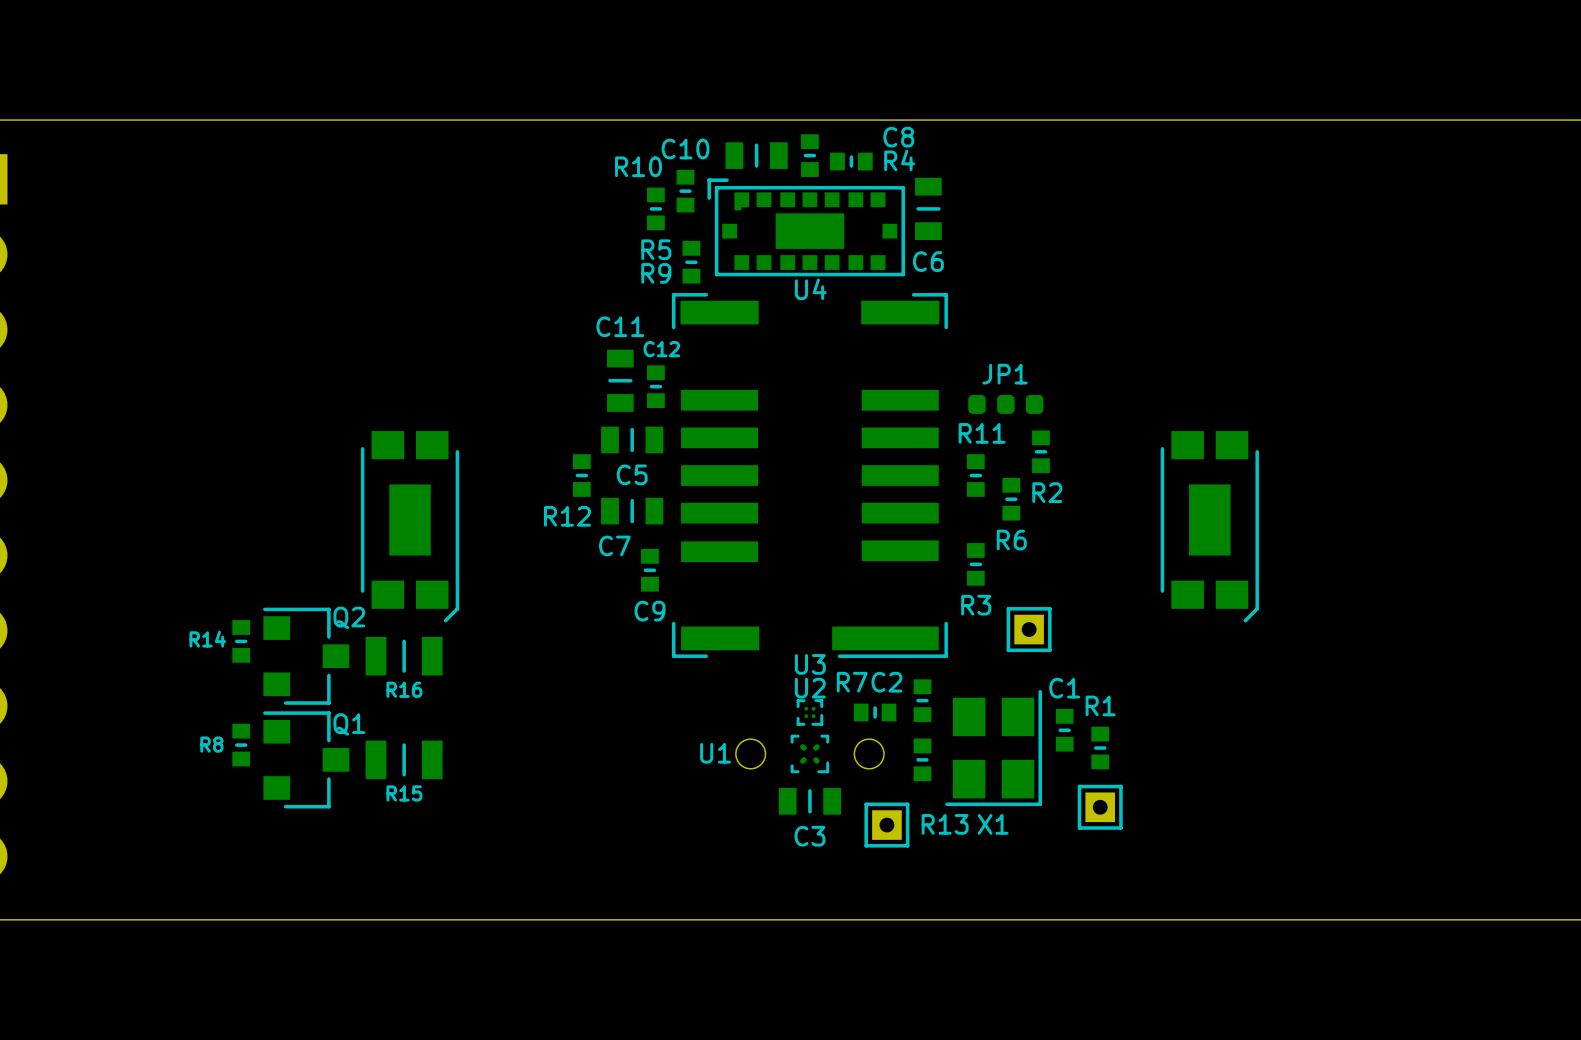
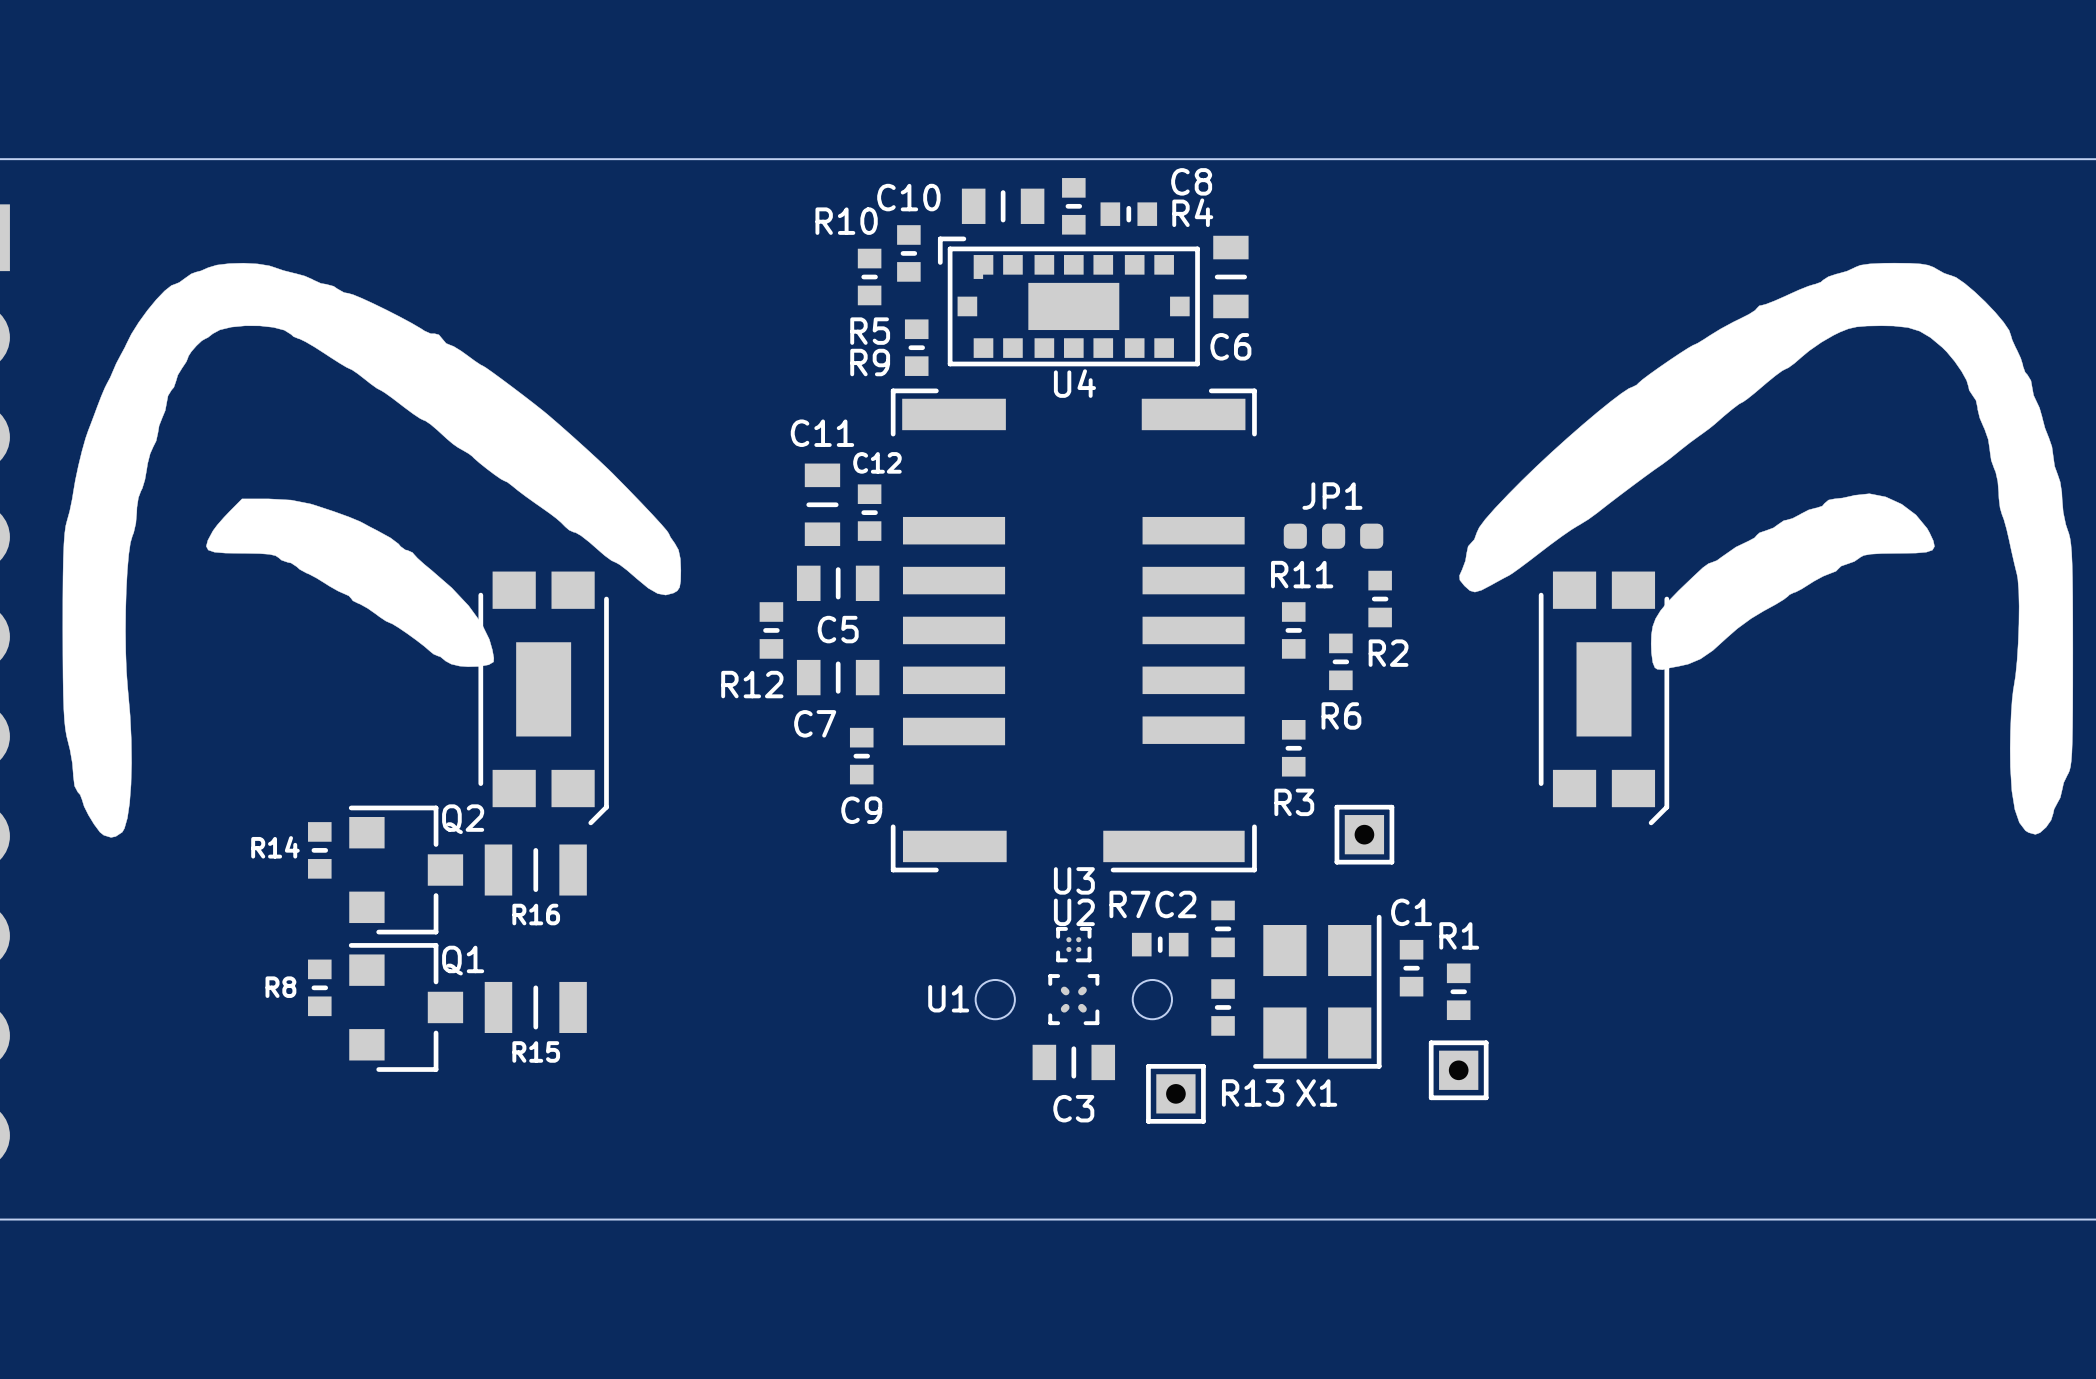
drawing: none -> [62, 262, 2074, 838]

